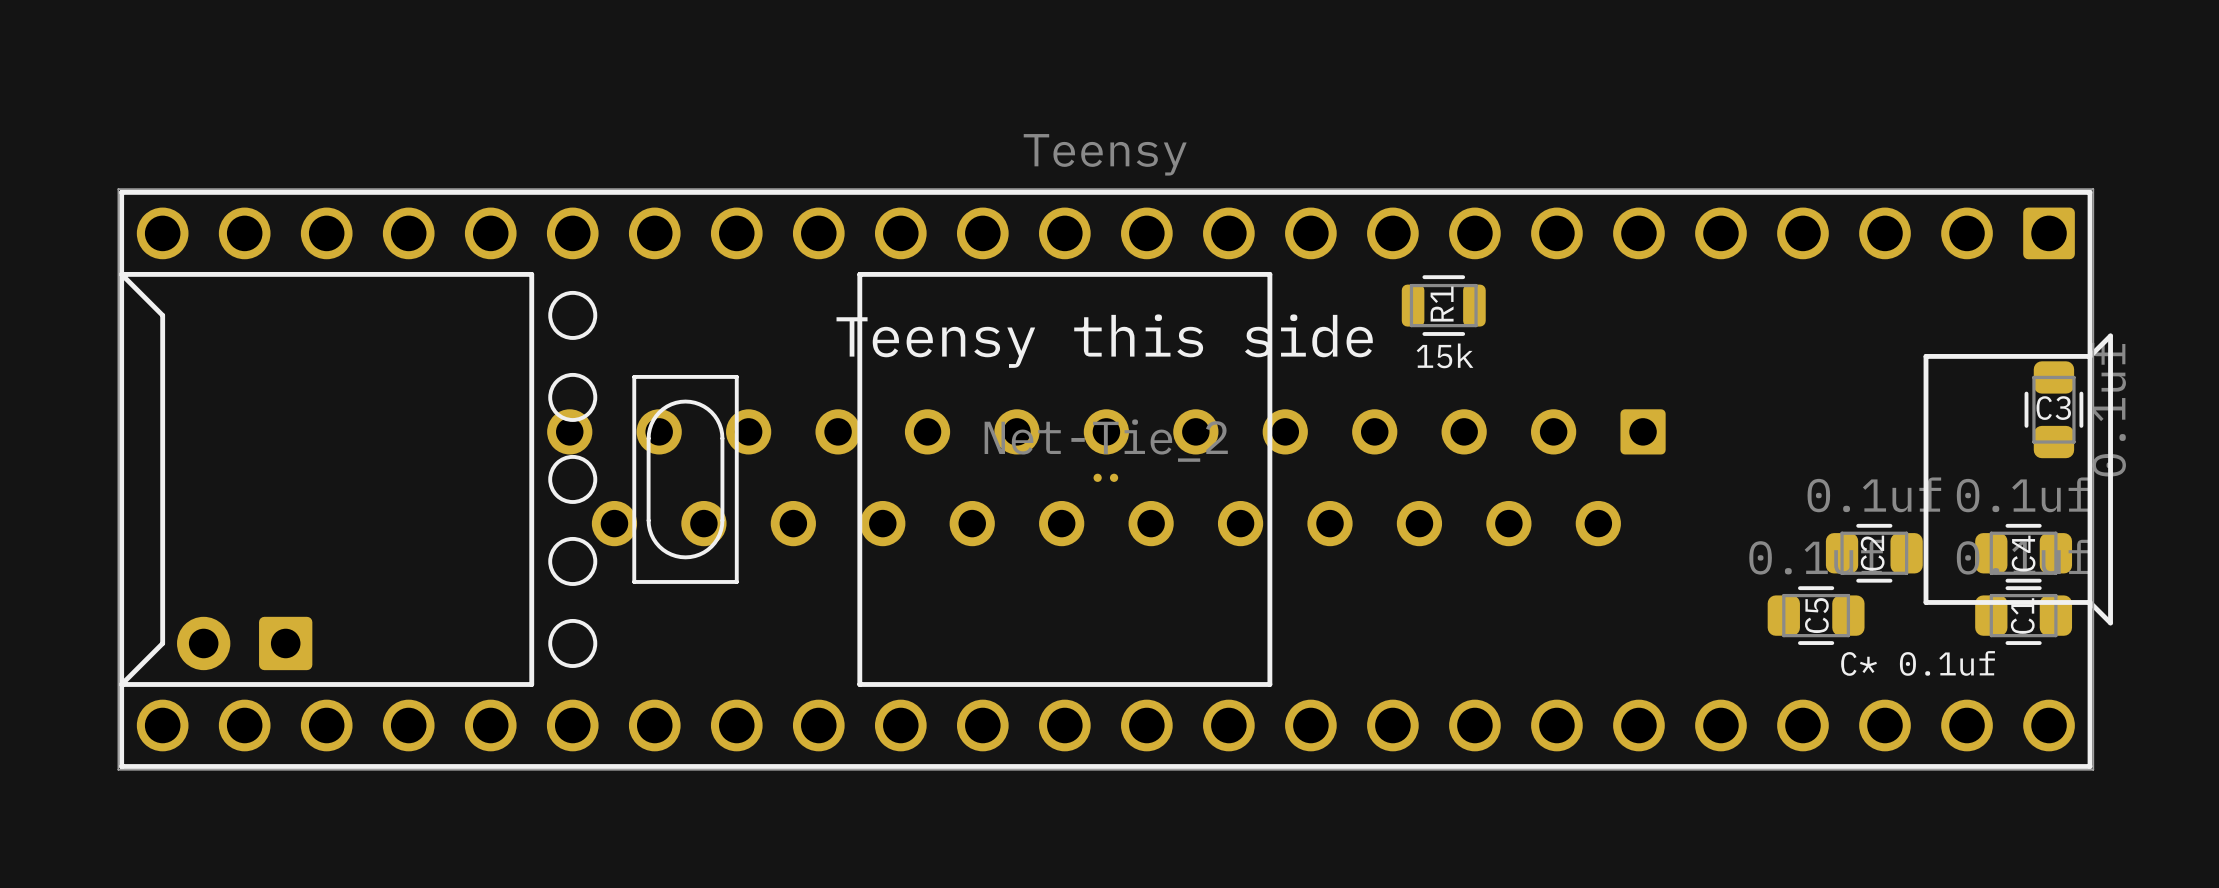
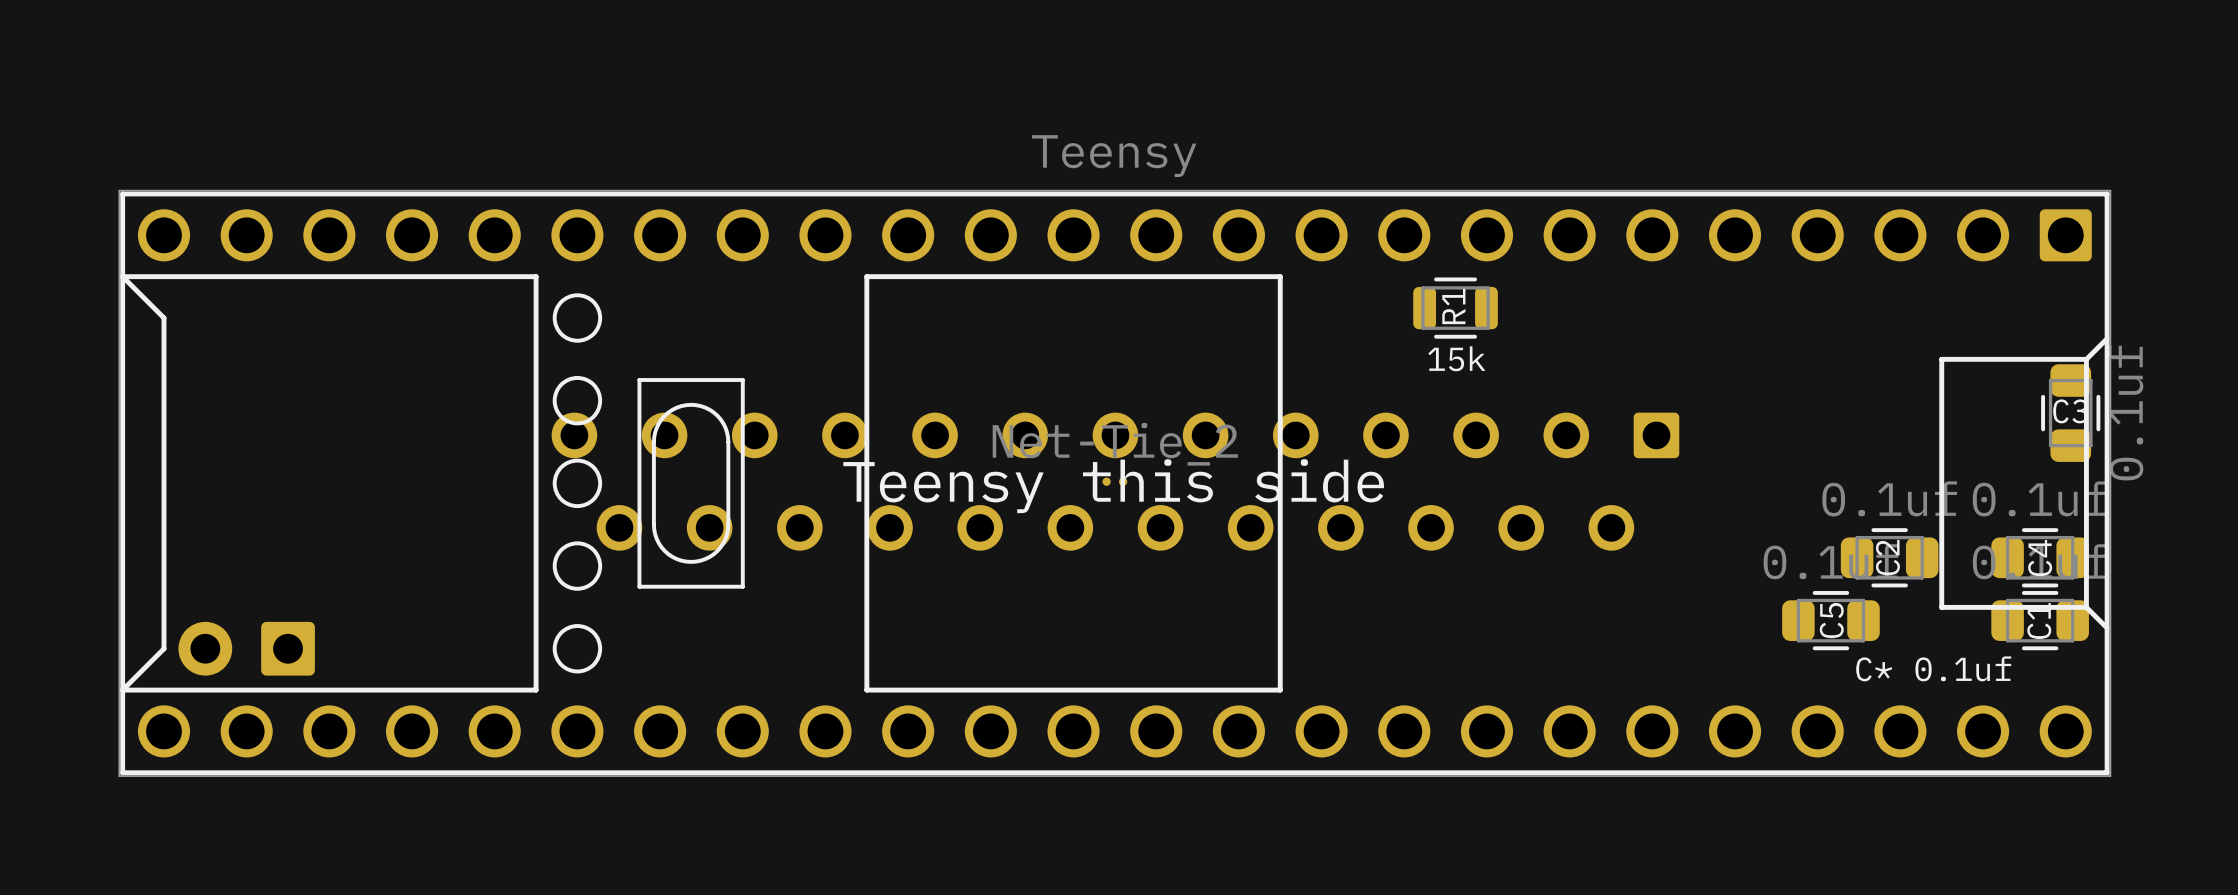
part footprint: [119, 189, 2113, 769] -> [120, 191, 2110, 776]
text position: Teensy this side (1104, 341) -> Teensy this side (1113, 486)

